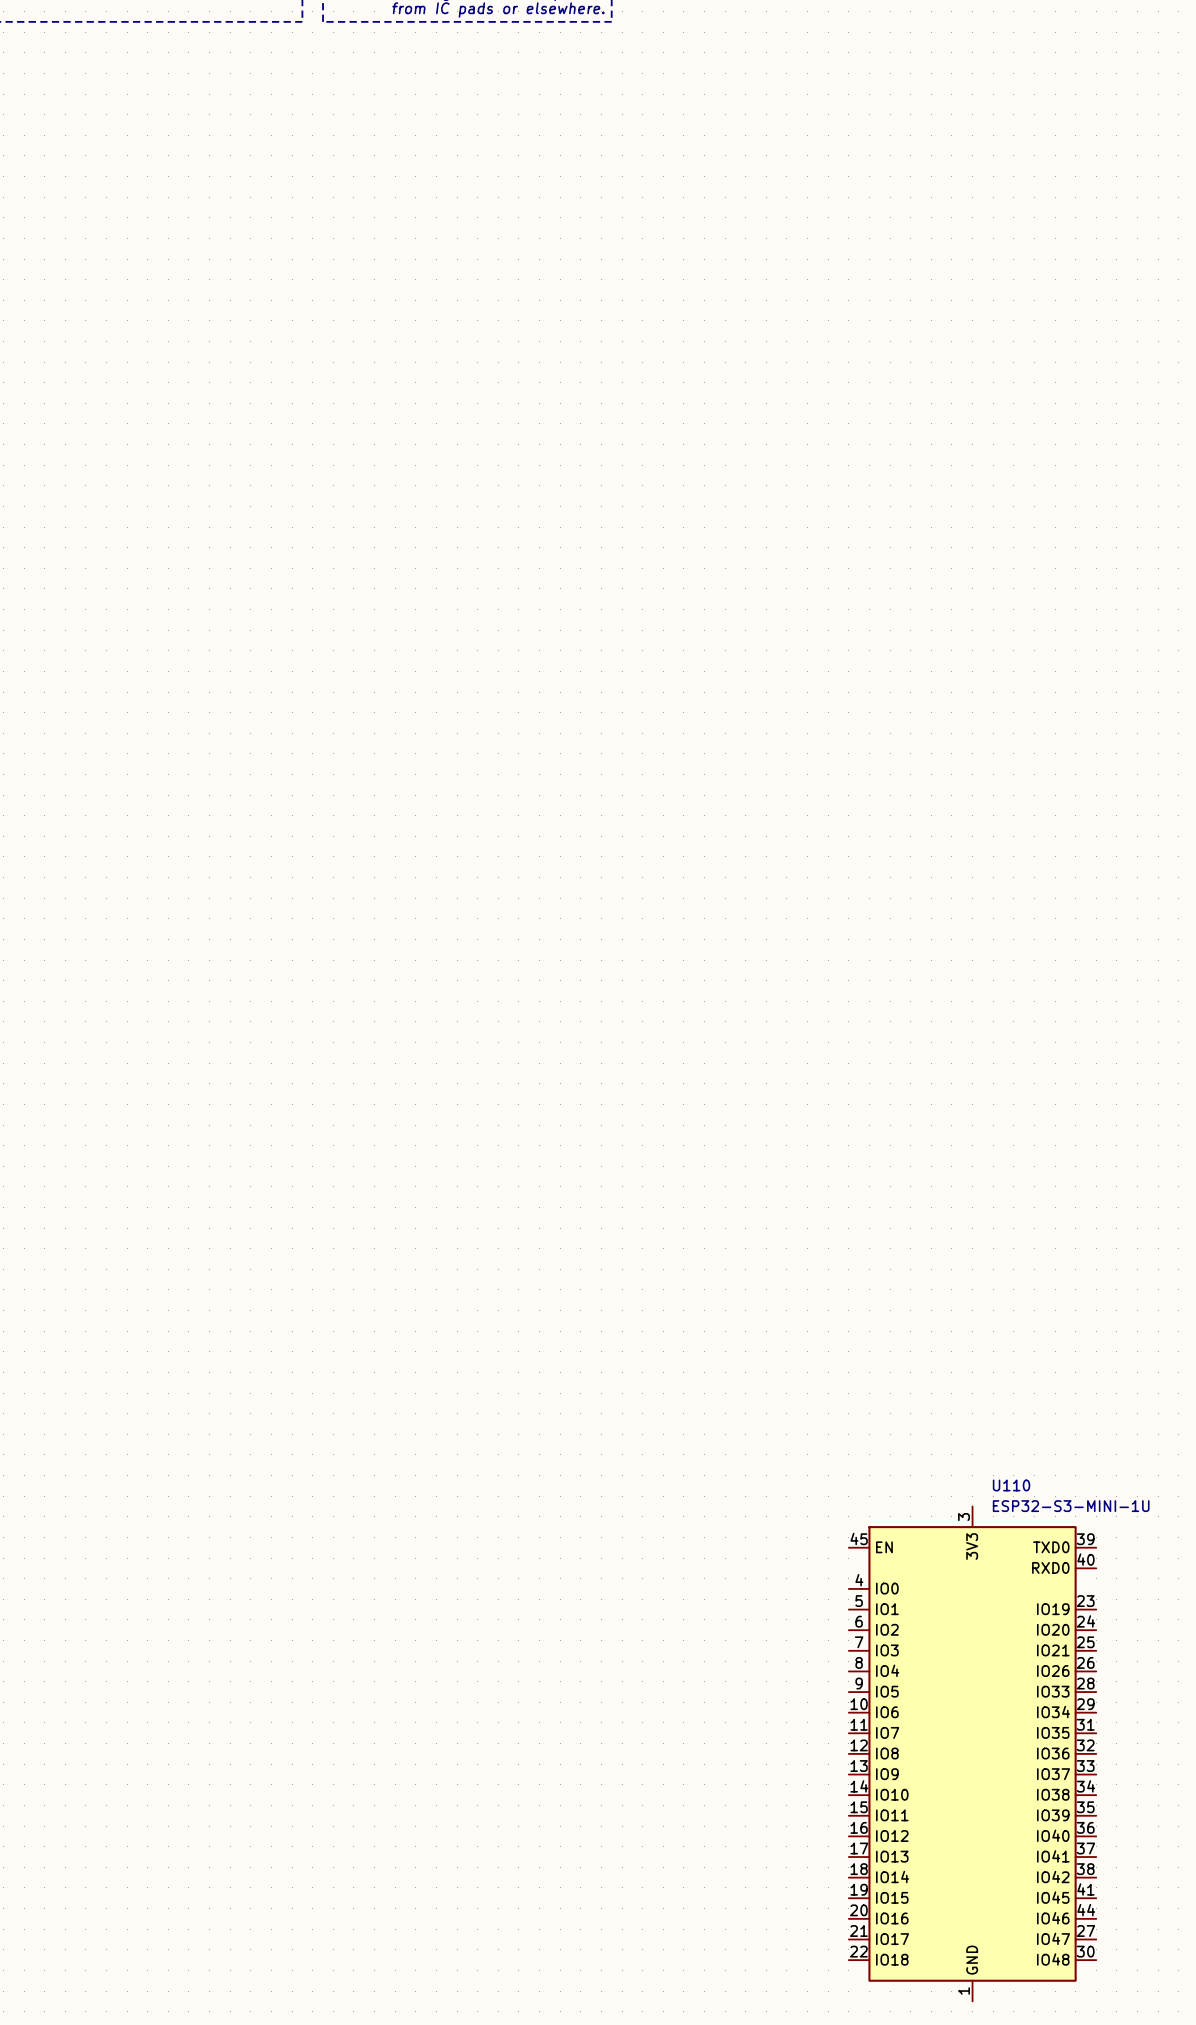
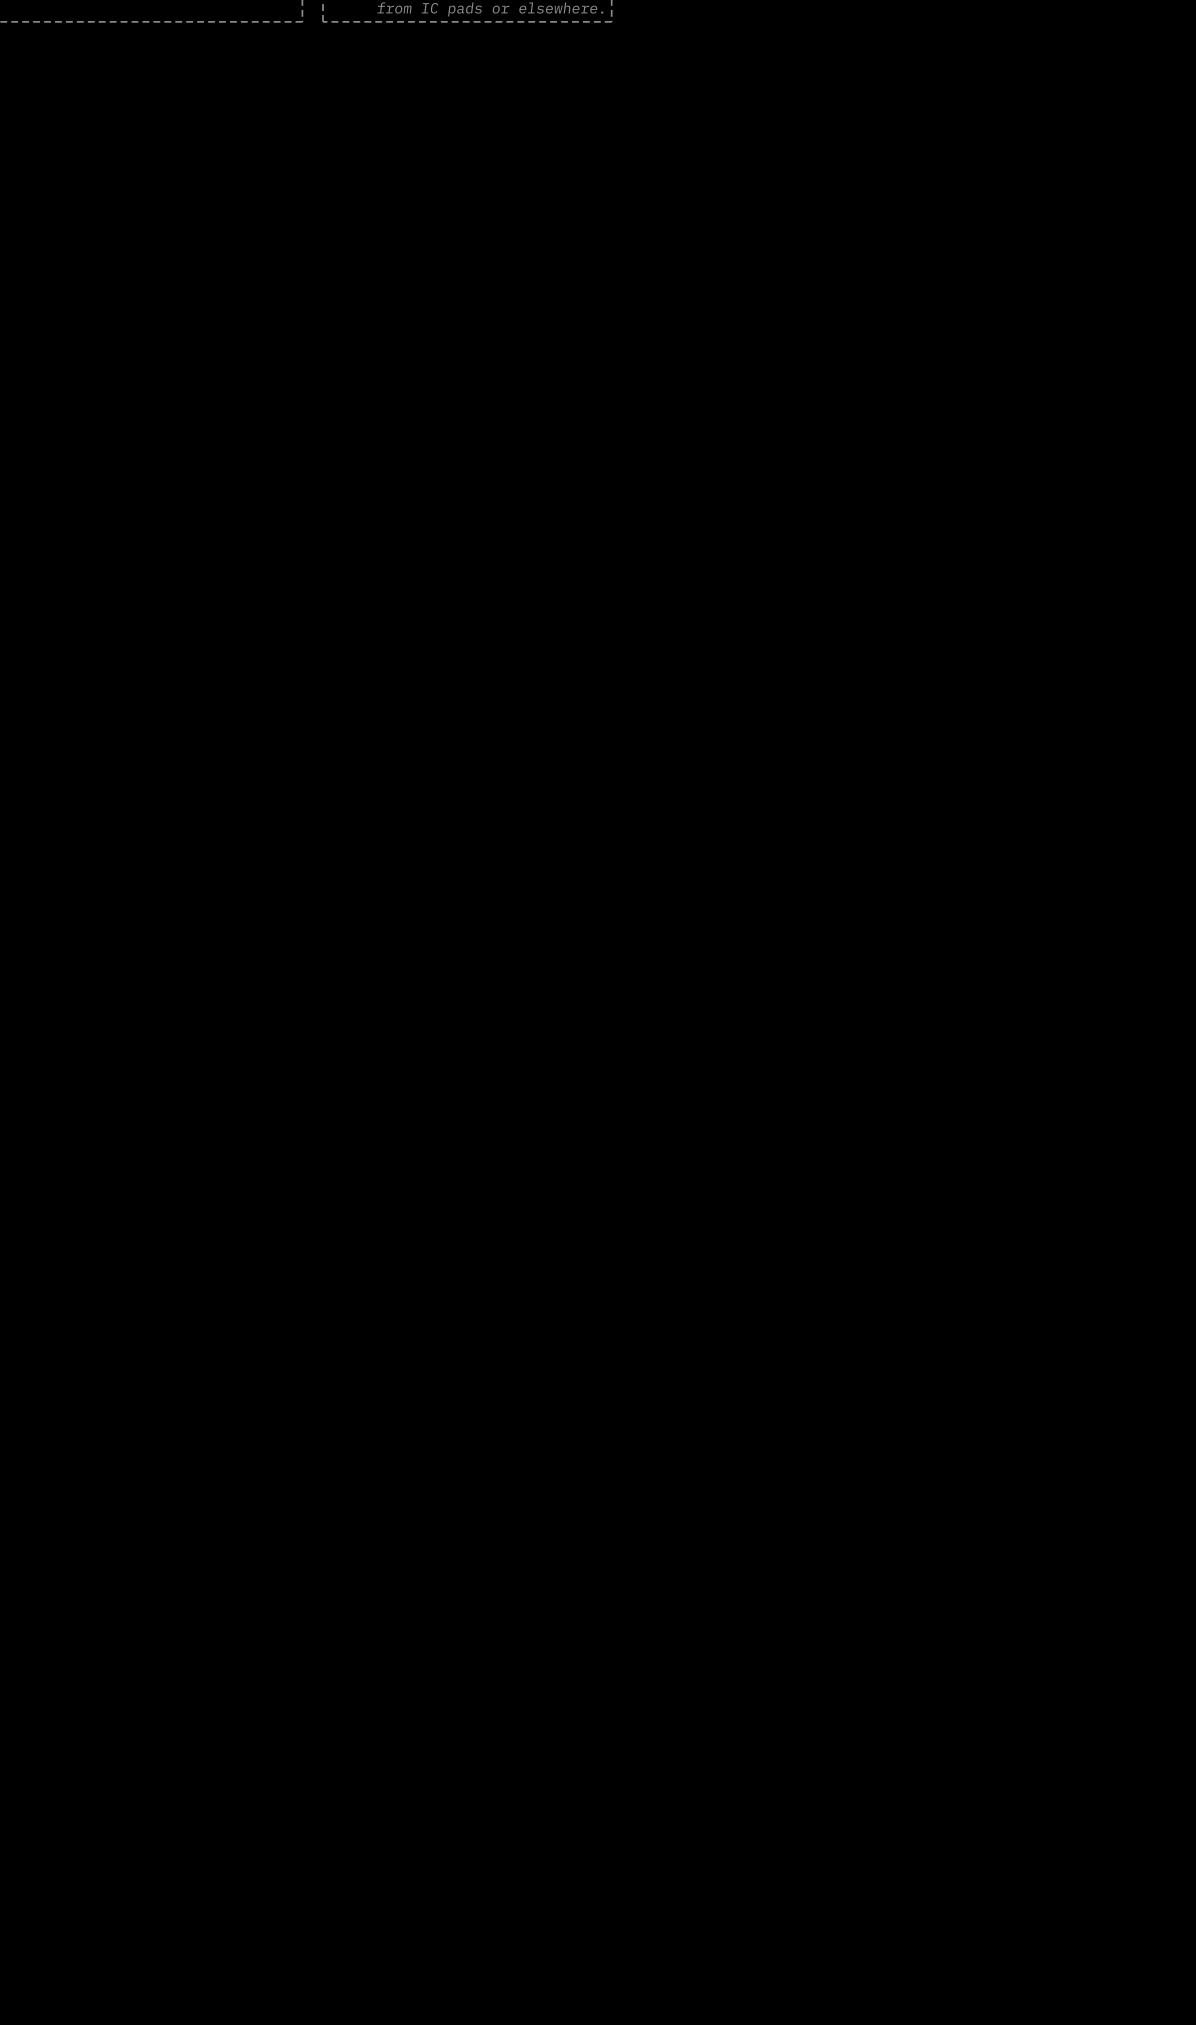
U110: ESP32-S3-MINI-1U (972, 1753) -> none

